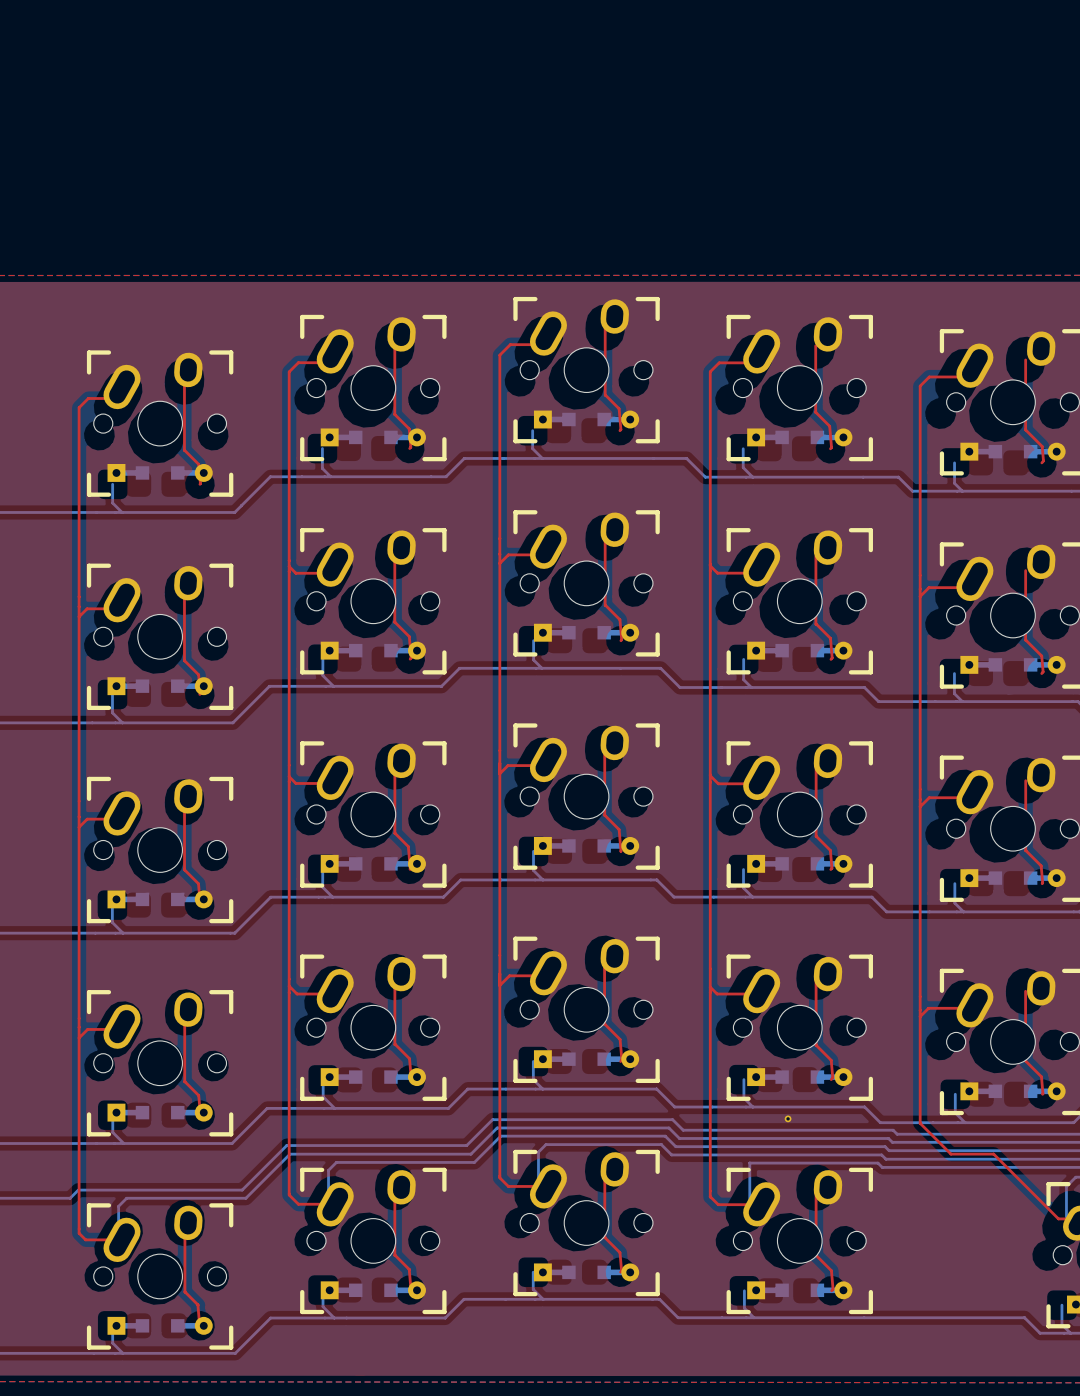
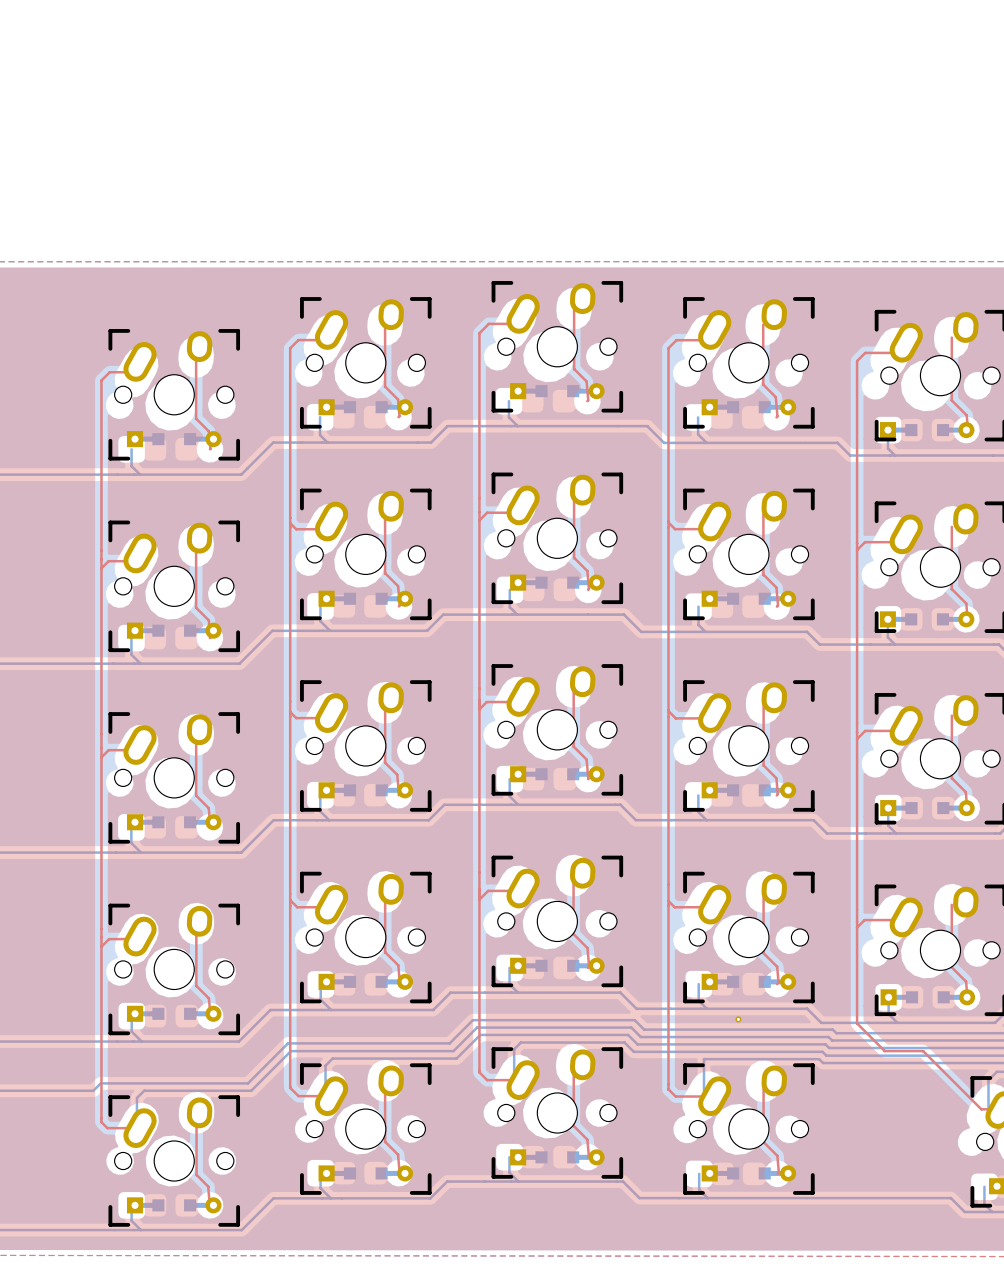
part position: (1013, 451) -> (927, 430)
part position: (1013, 664) -> (927, 619)
part position: (1013, 878) -> (927, 808)
part position: (1013, 1091) -> (927, 997)

